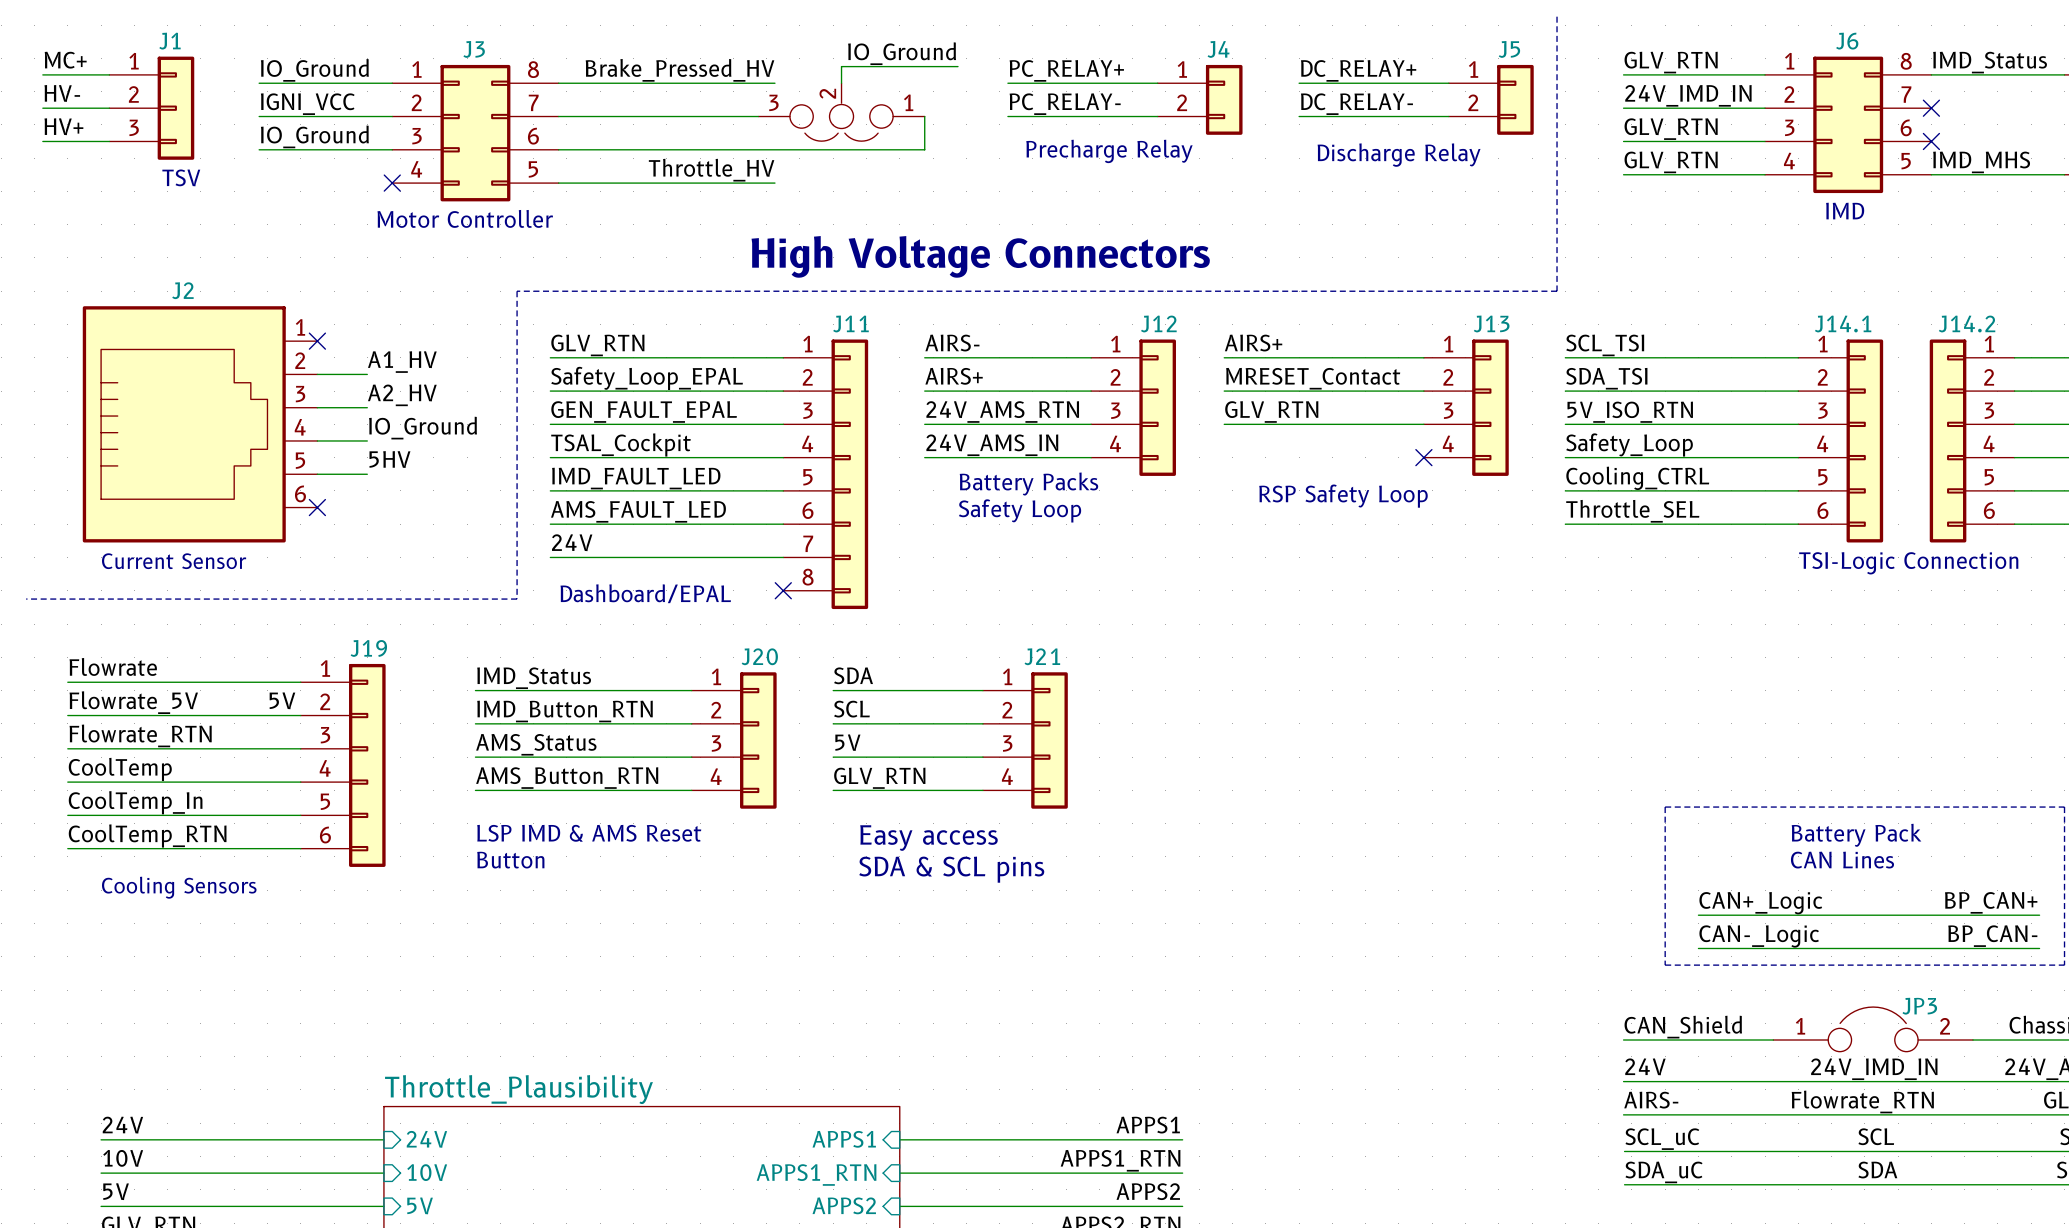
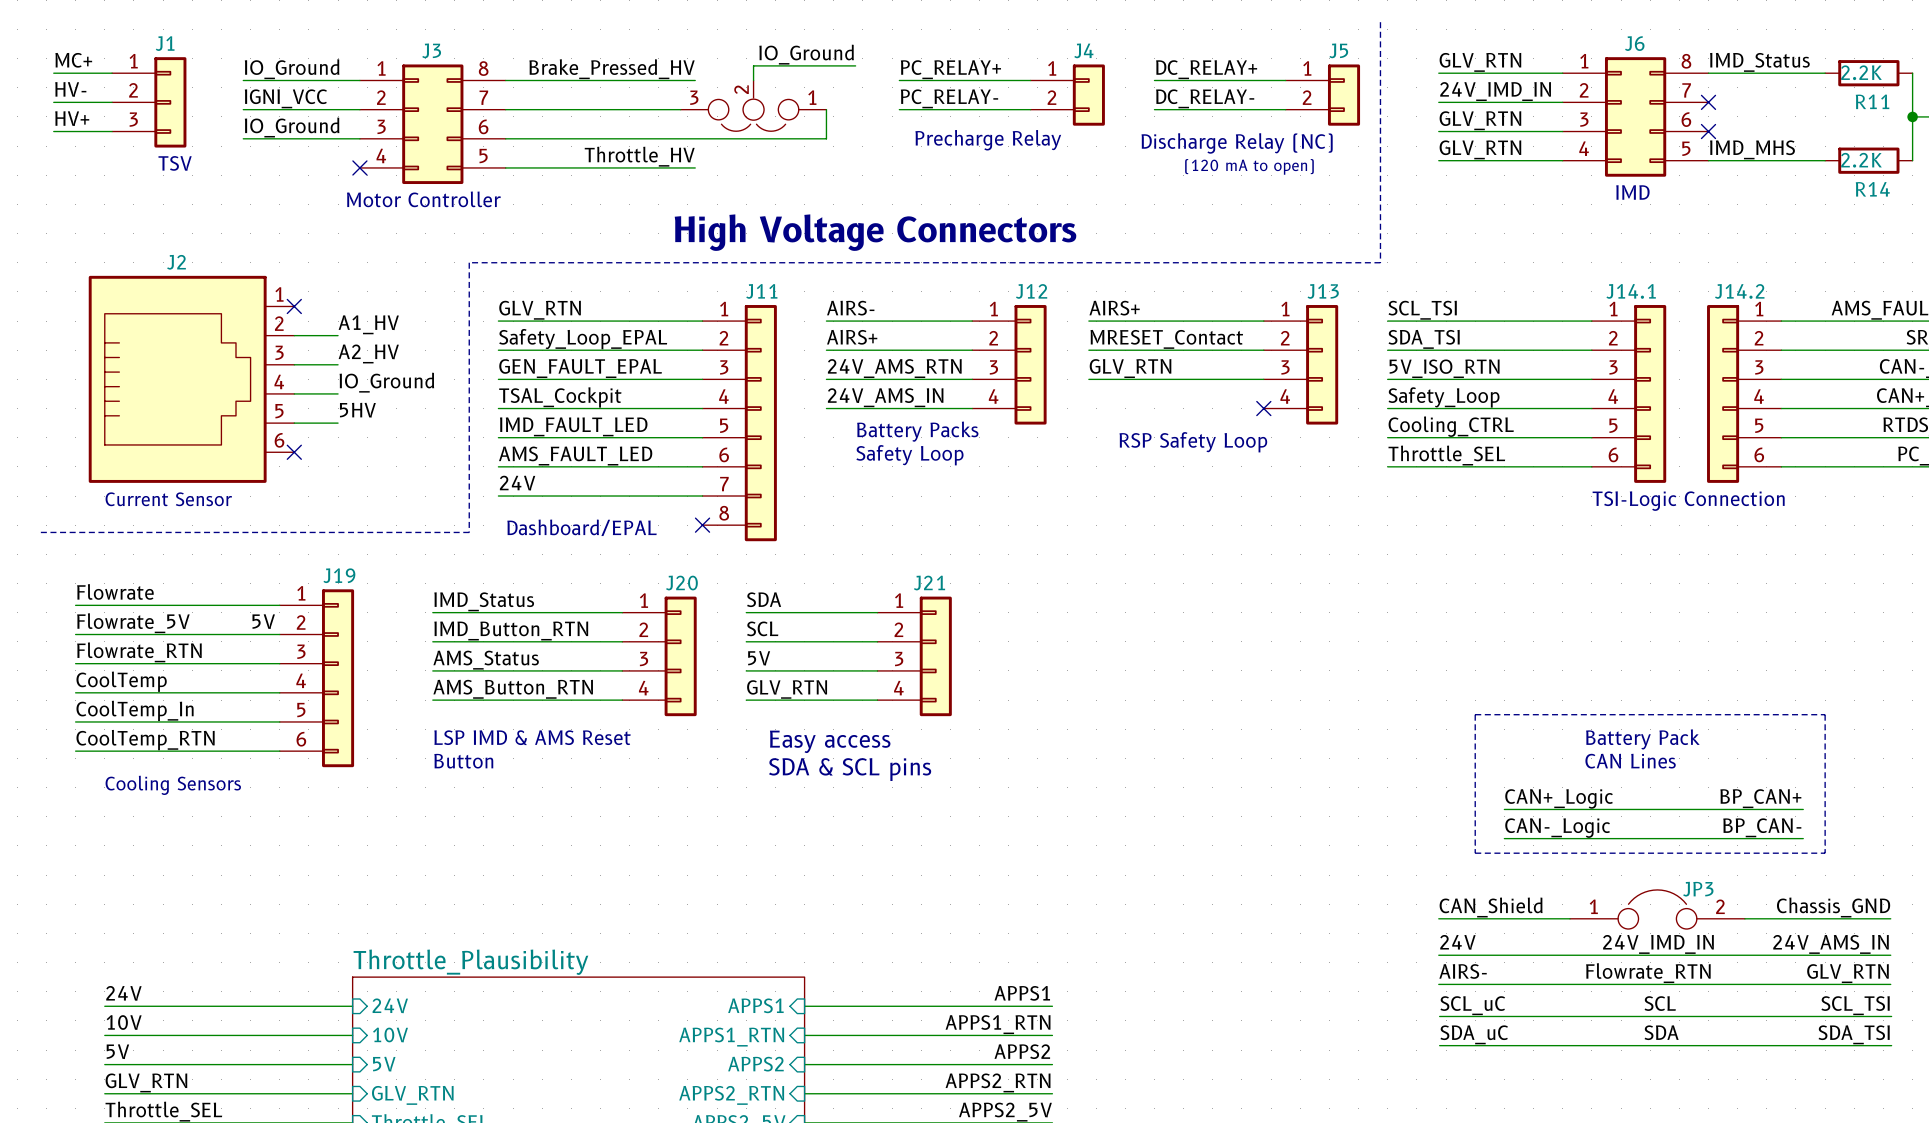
text: Discharge Relay (1399, 155) -> Discharge Relay (NC) (1237, 143)
text: none -> (120 mA to open) (1249, 166)

